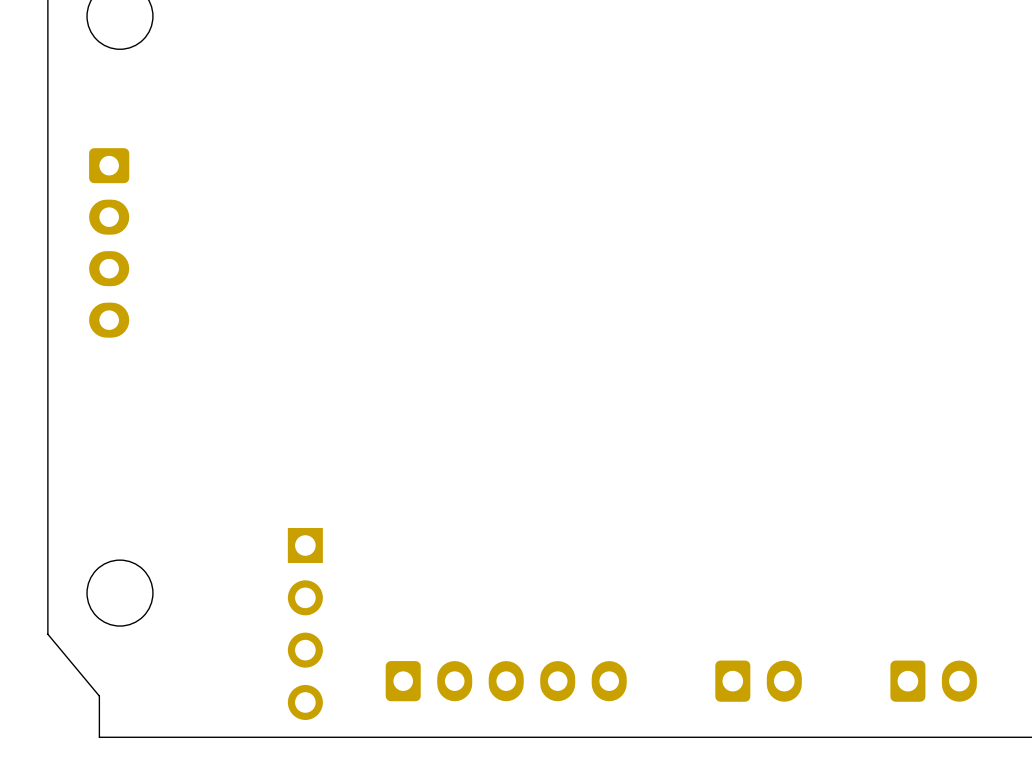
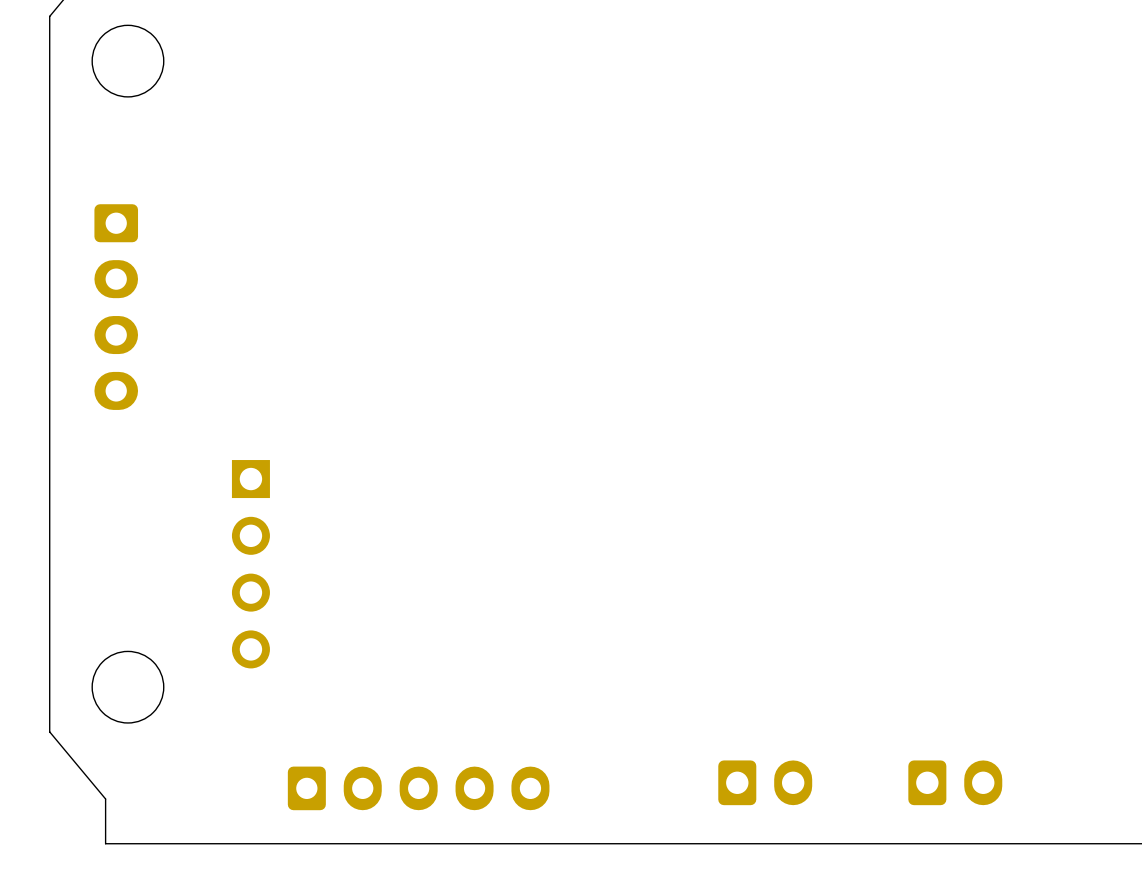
part position: (305, 623) -> (250, 564)
part position: (506, 681) -> (418, 788)
part position: (758, 681) -> (765, 782)
part position: (933, 681) -> (955, 782)

